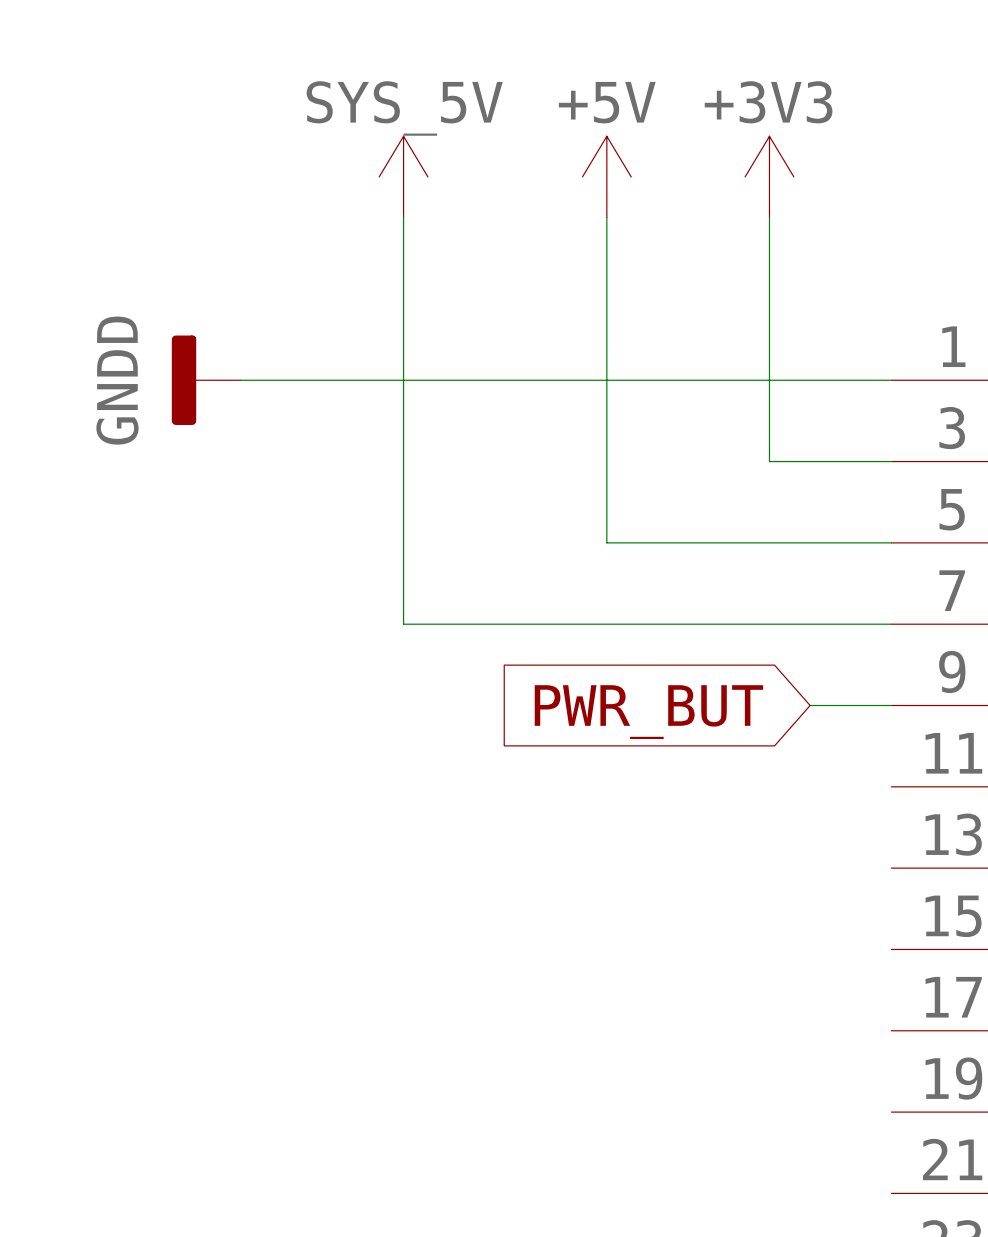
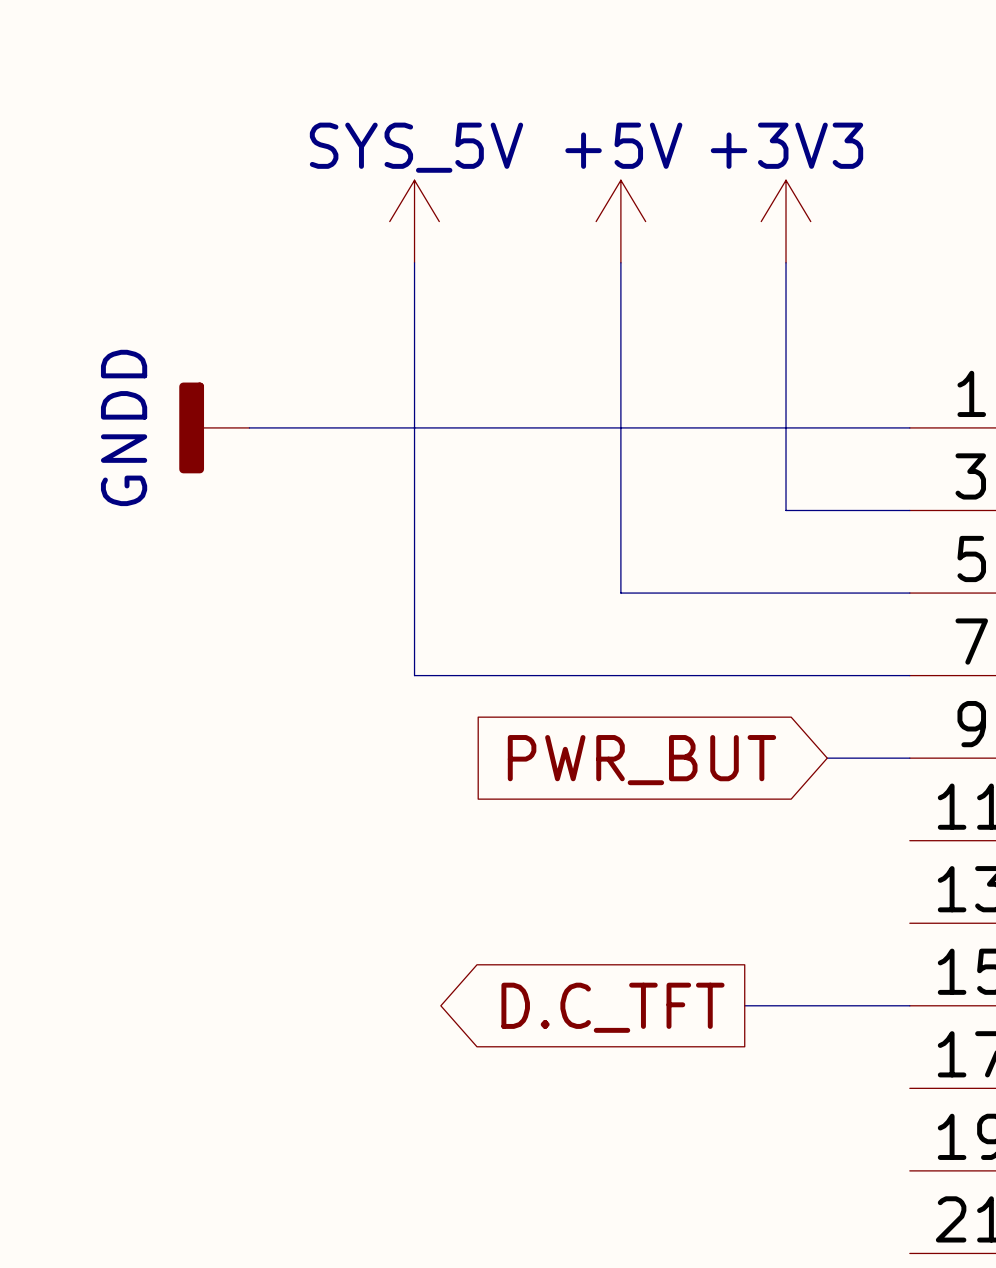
wire: none -> (744, 1005) (909, 1005)
global label: none -> D.C_TFT (612, 1007)

